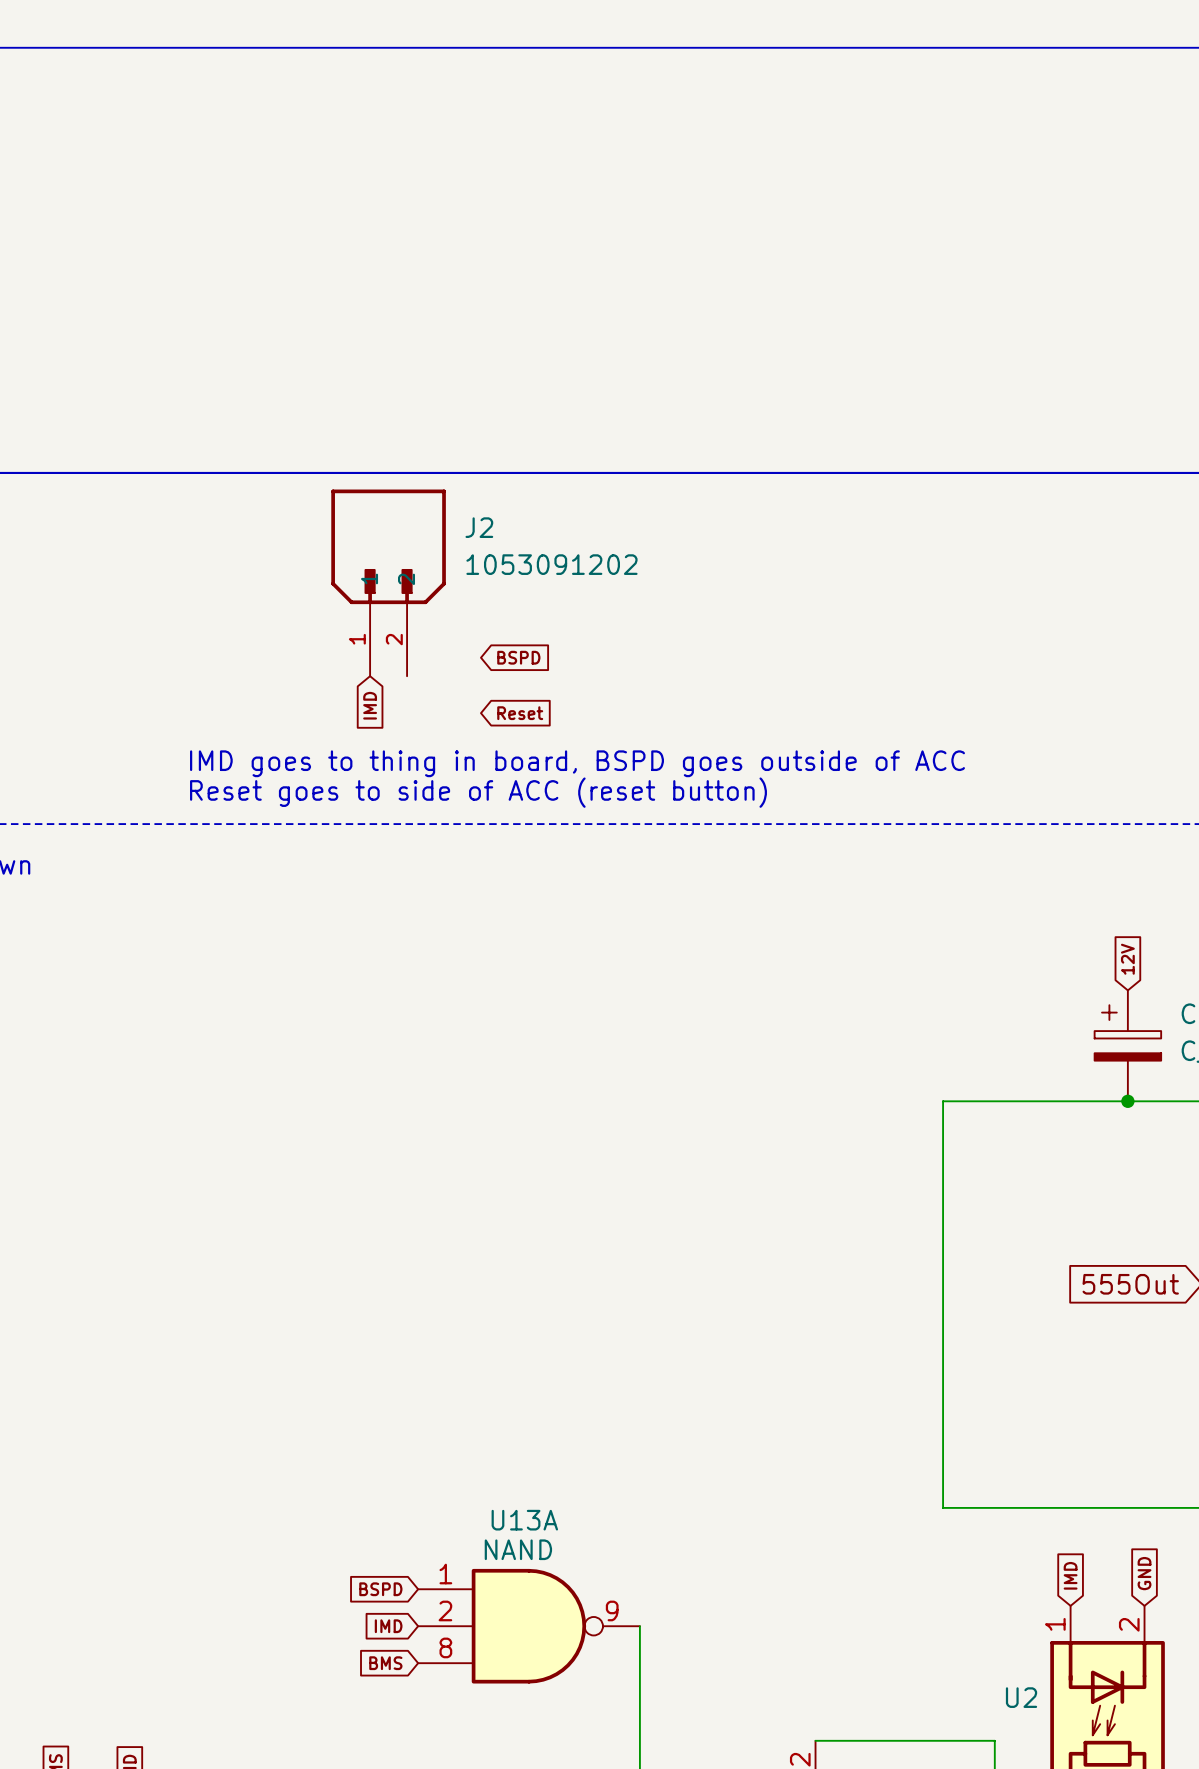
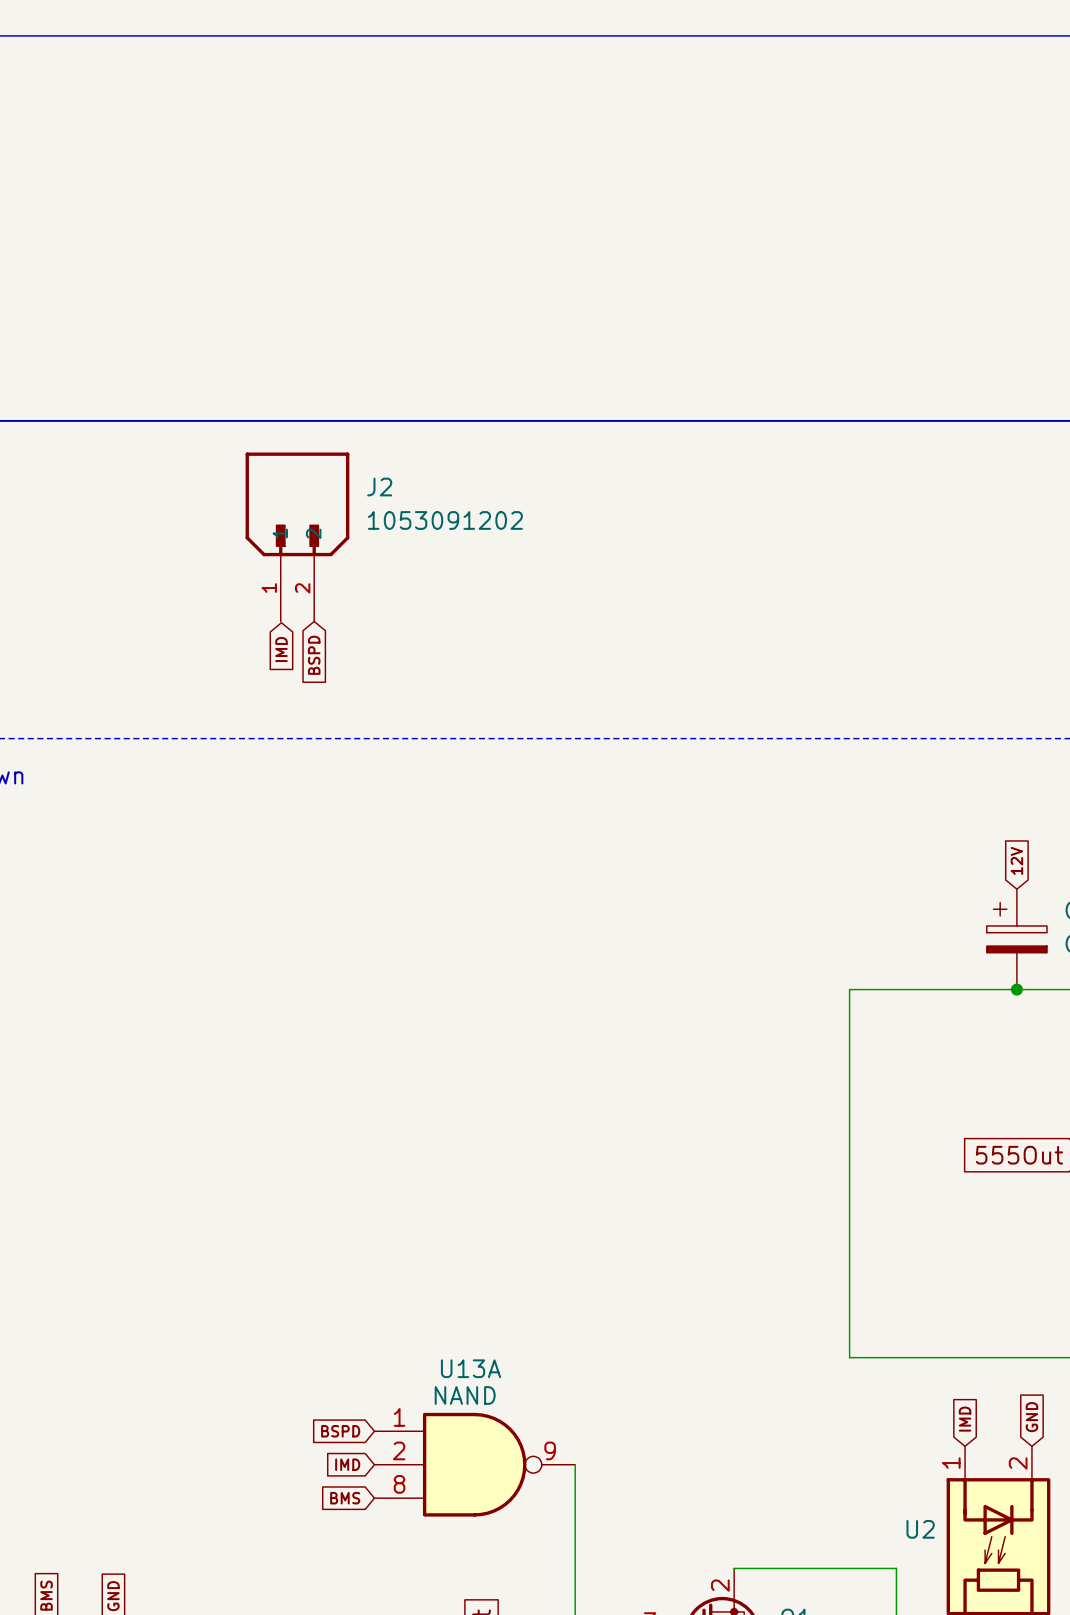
J2 position: (388, 582) -> (297, 537)
global label rotation: 0° (518, 657) -> 90° clockwise (314, 655)
global label position: BSPD (518, 657) -> BSPD (314, 655)
global label position: IMD (370, 705) -> IMD (281, 649)
global label: Reset (520, 713) -> none
text: IMD goes to thing in board, BSPD goes outside of ACC (577, 763) -> none
text: Reset goes to side of ACC (reset button) (478, 792) -> none

